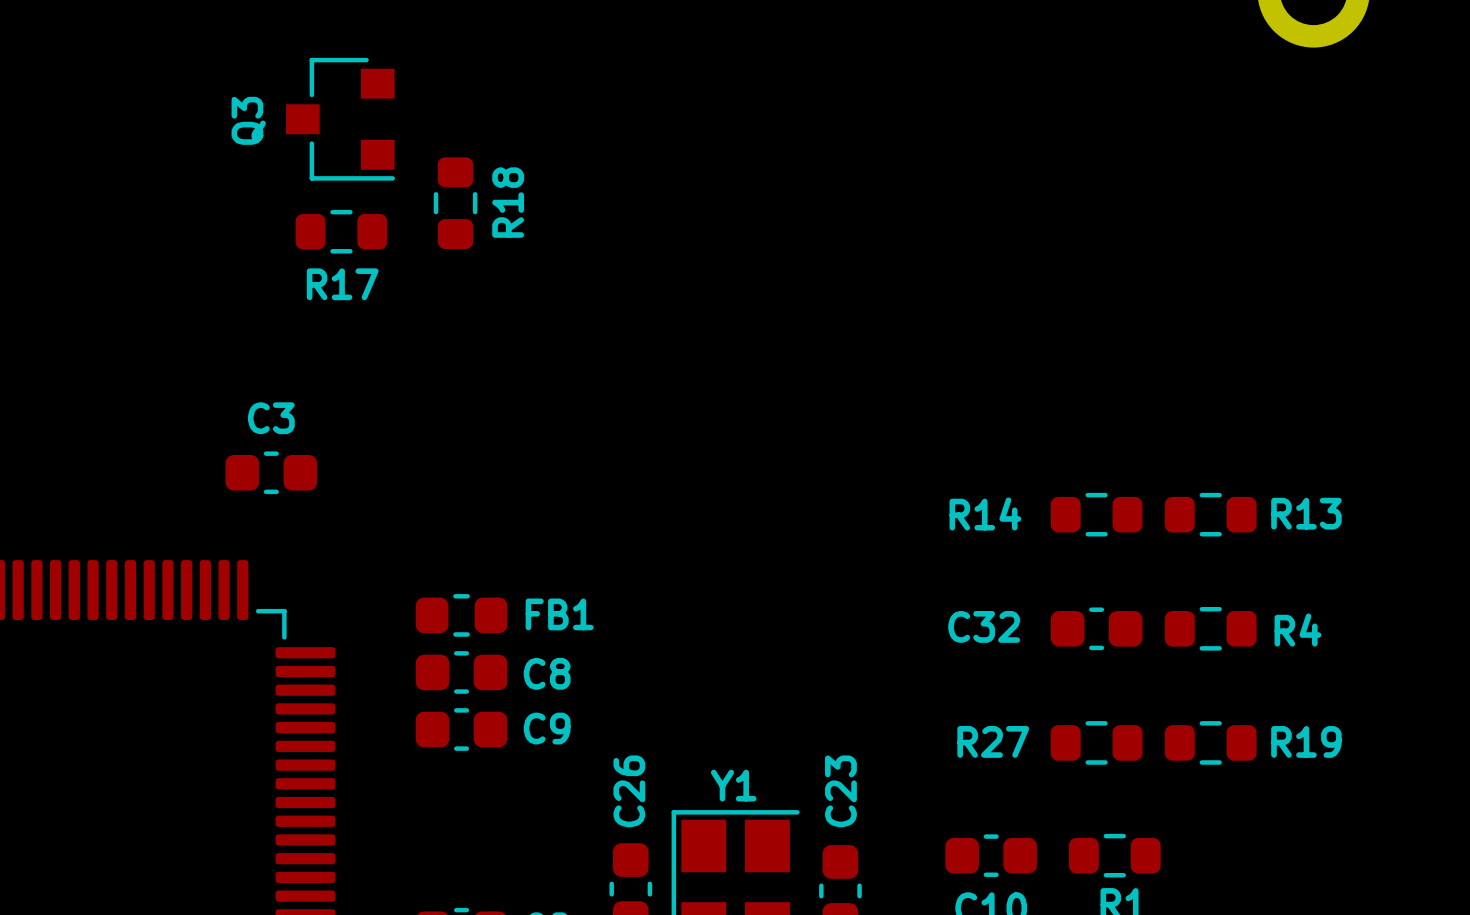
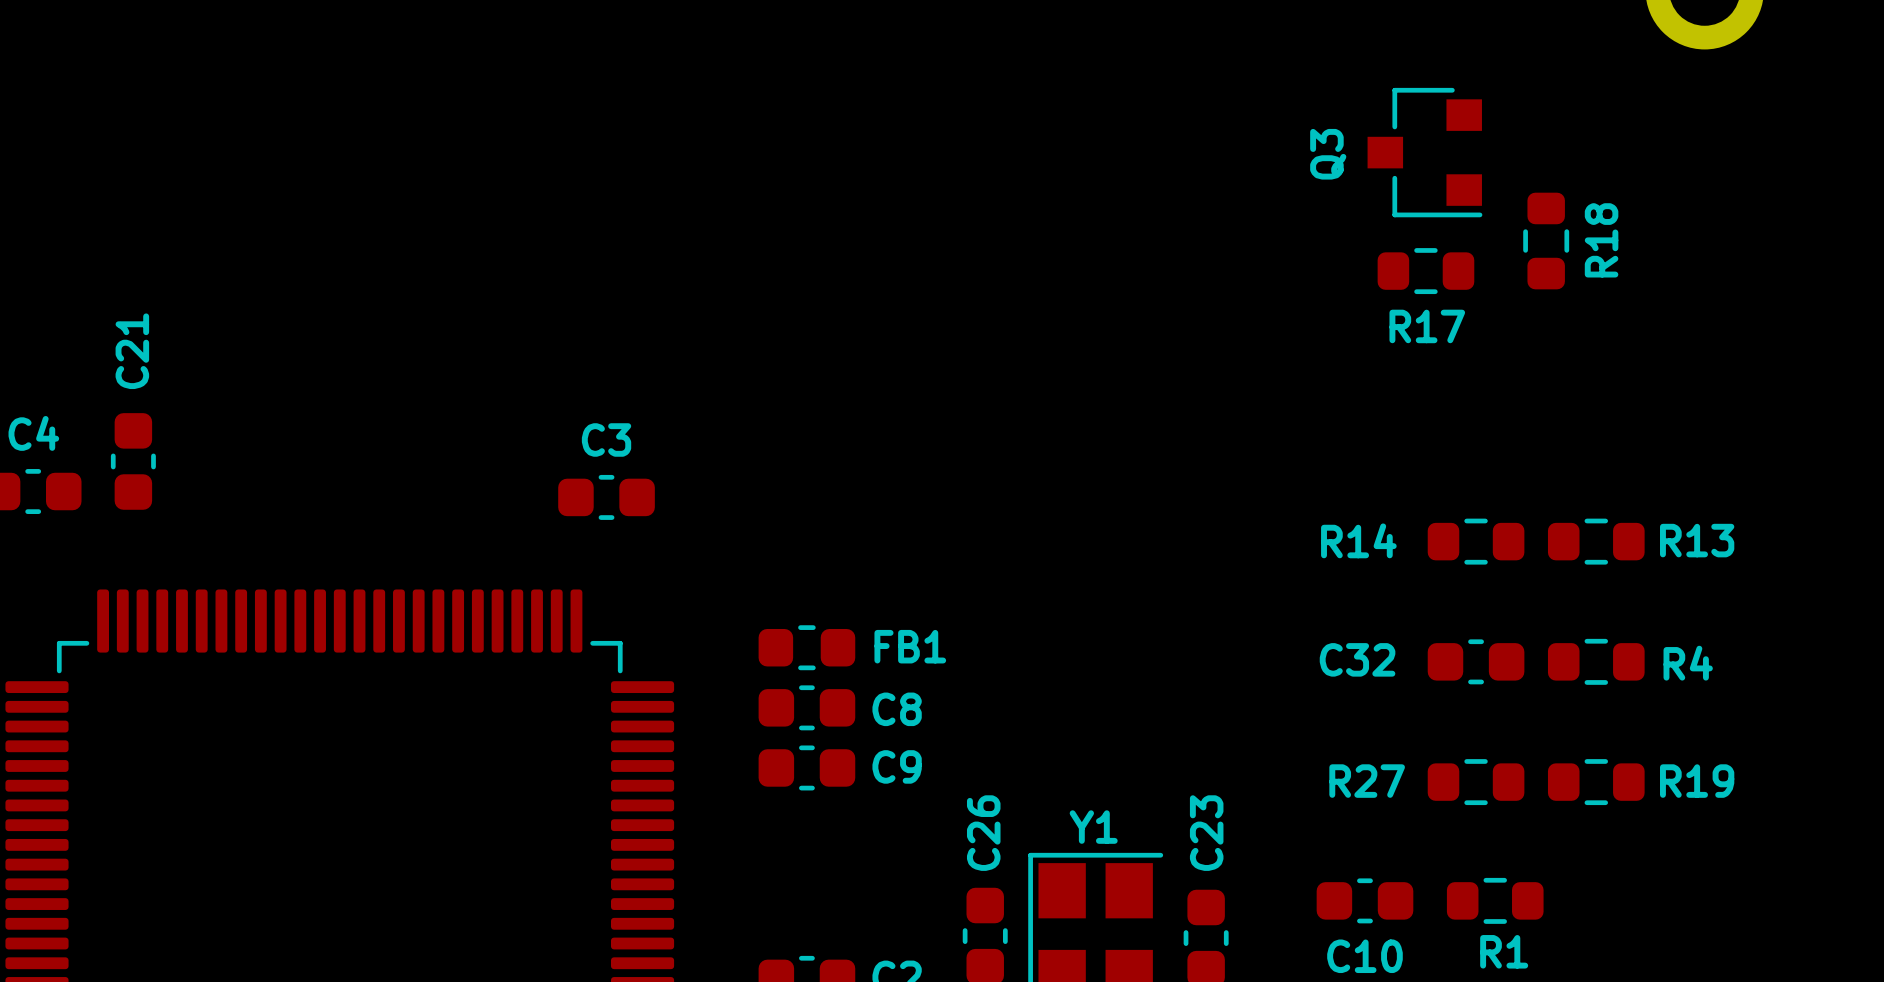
Q3 position: (340, 119) -> (1424, 152)
R18 position: (455, 203) -> (1546, 241)
R17 position: (341, 231) -> (1425, 271)

